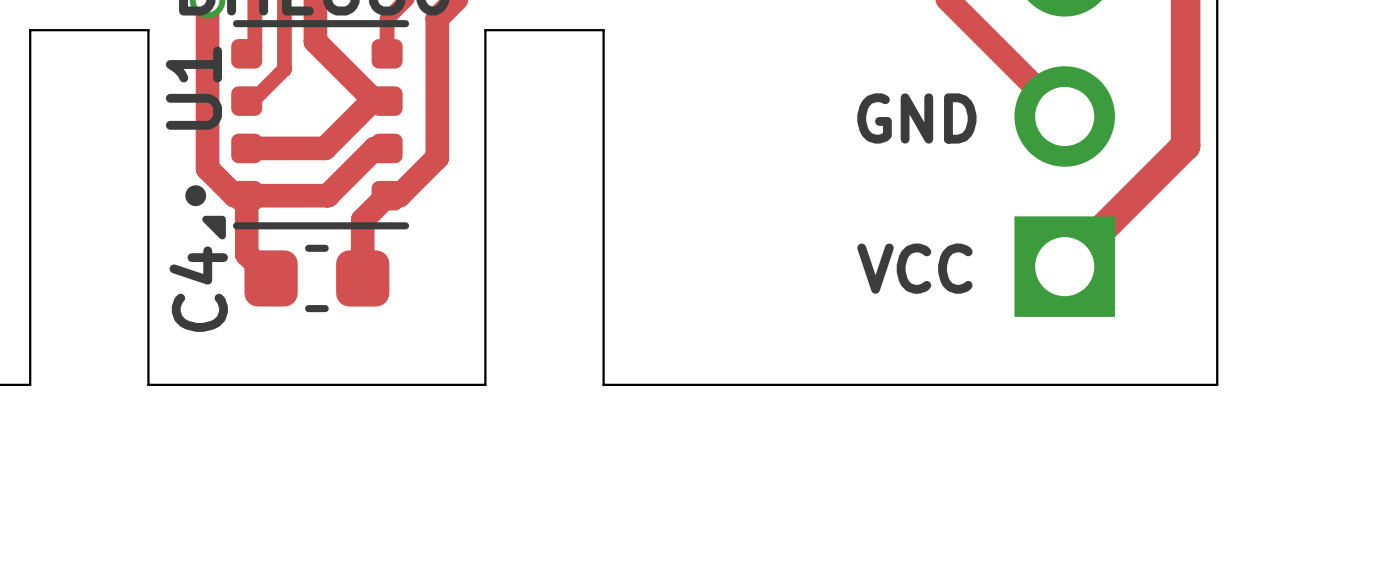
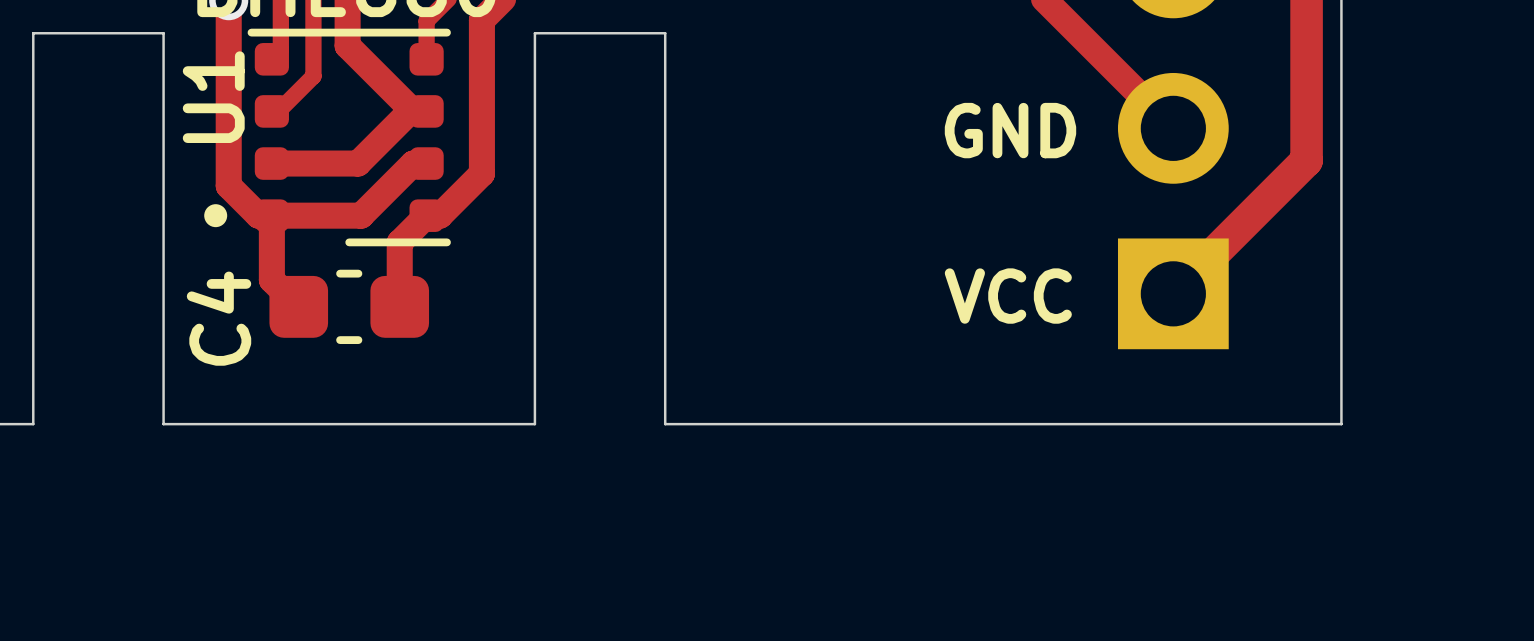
U1 footprint: [202, 20, 410, 240] -> [247, 28, 451, 247]

